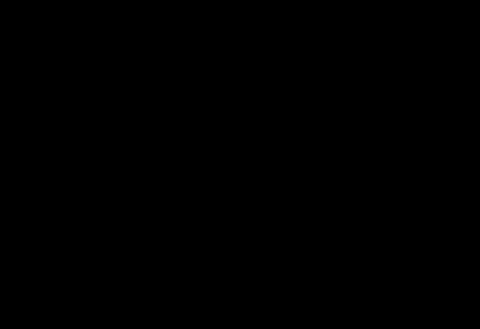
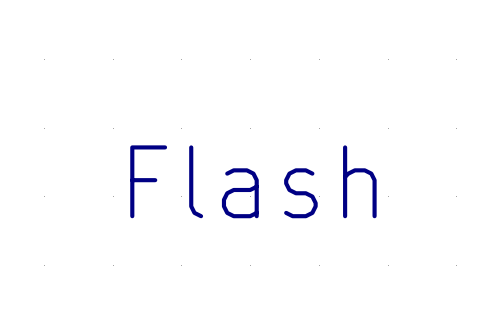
text: none -> Flash (253, 181)

